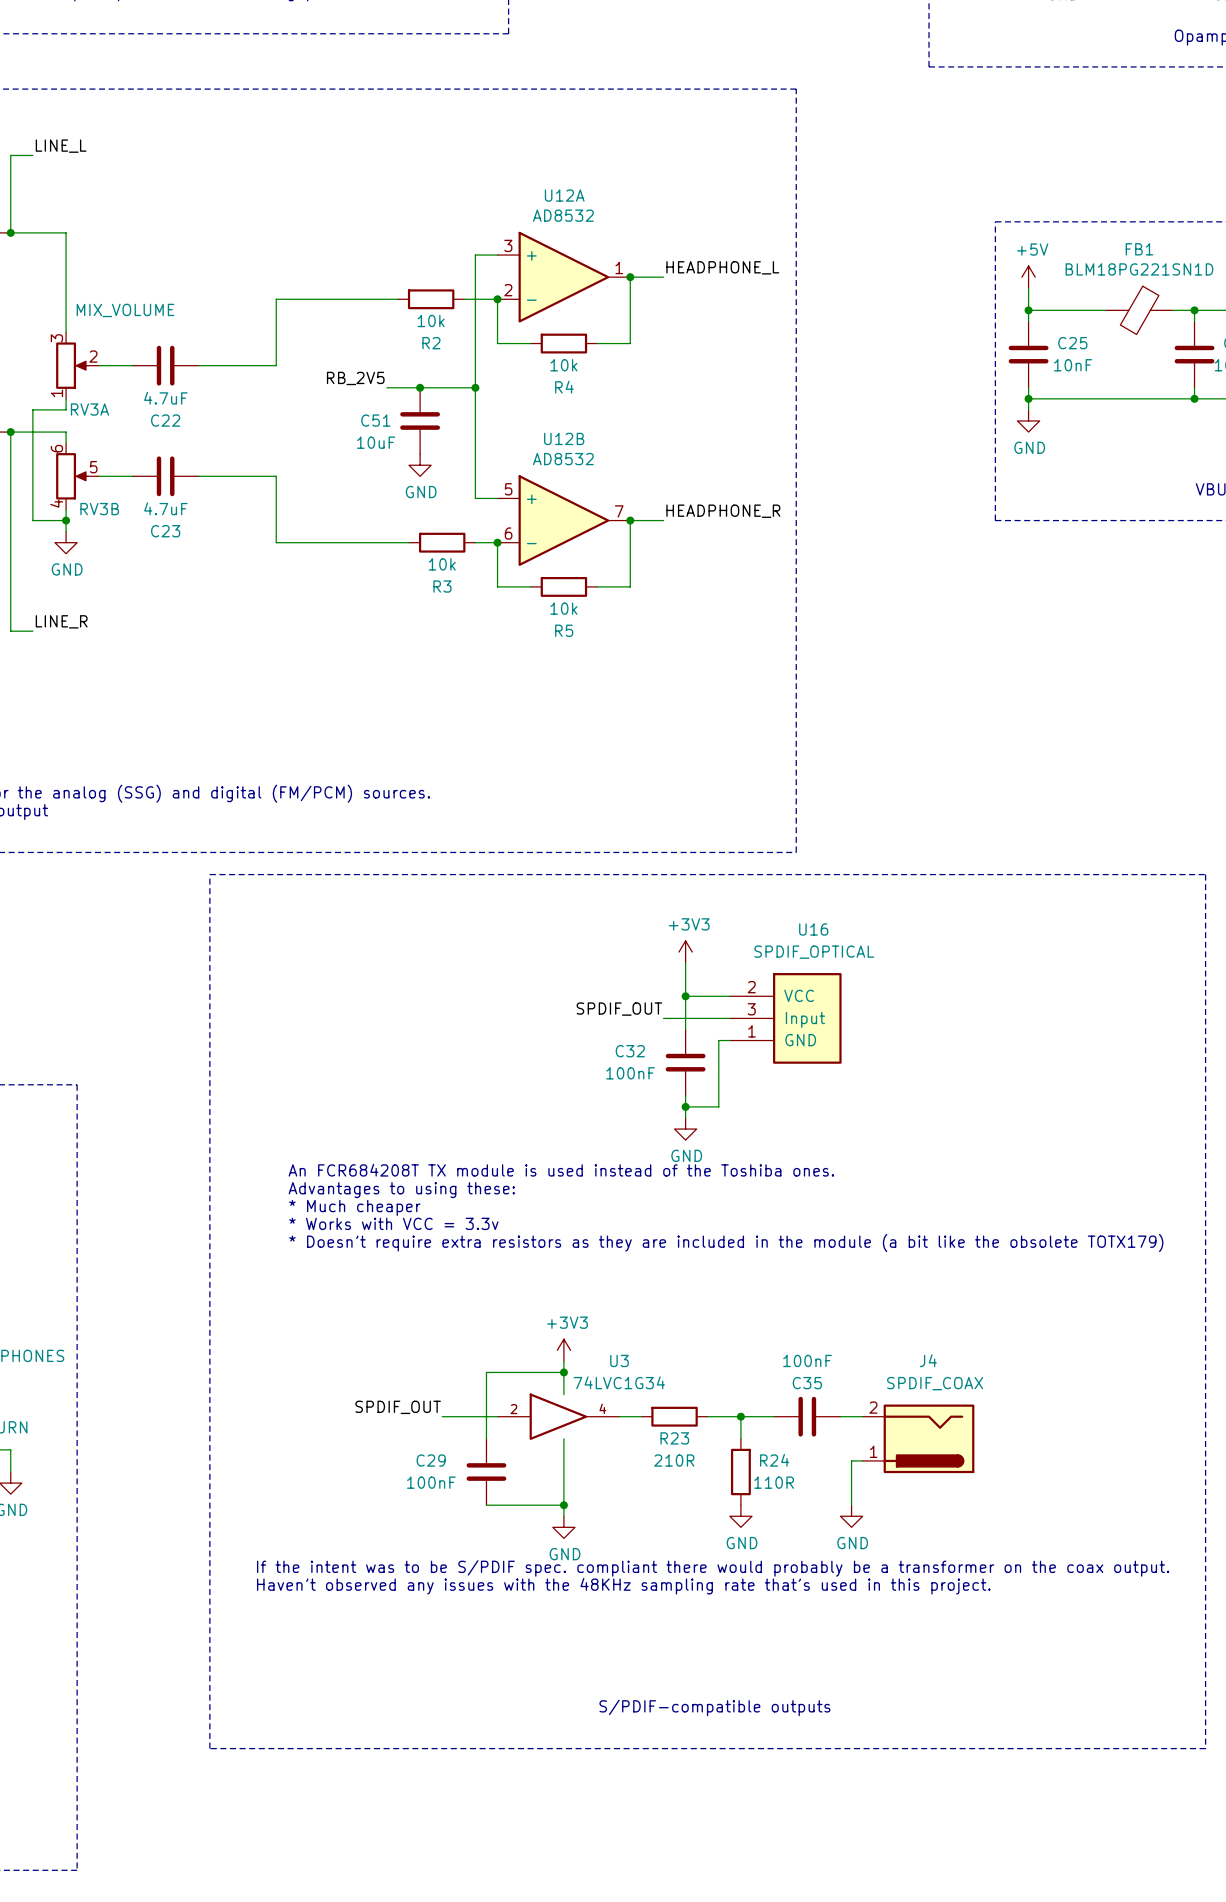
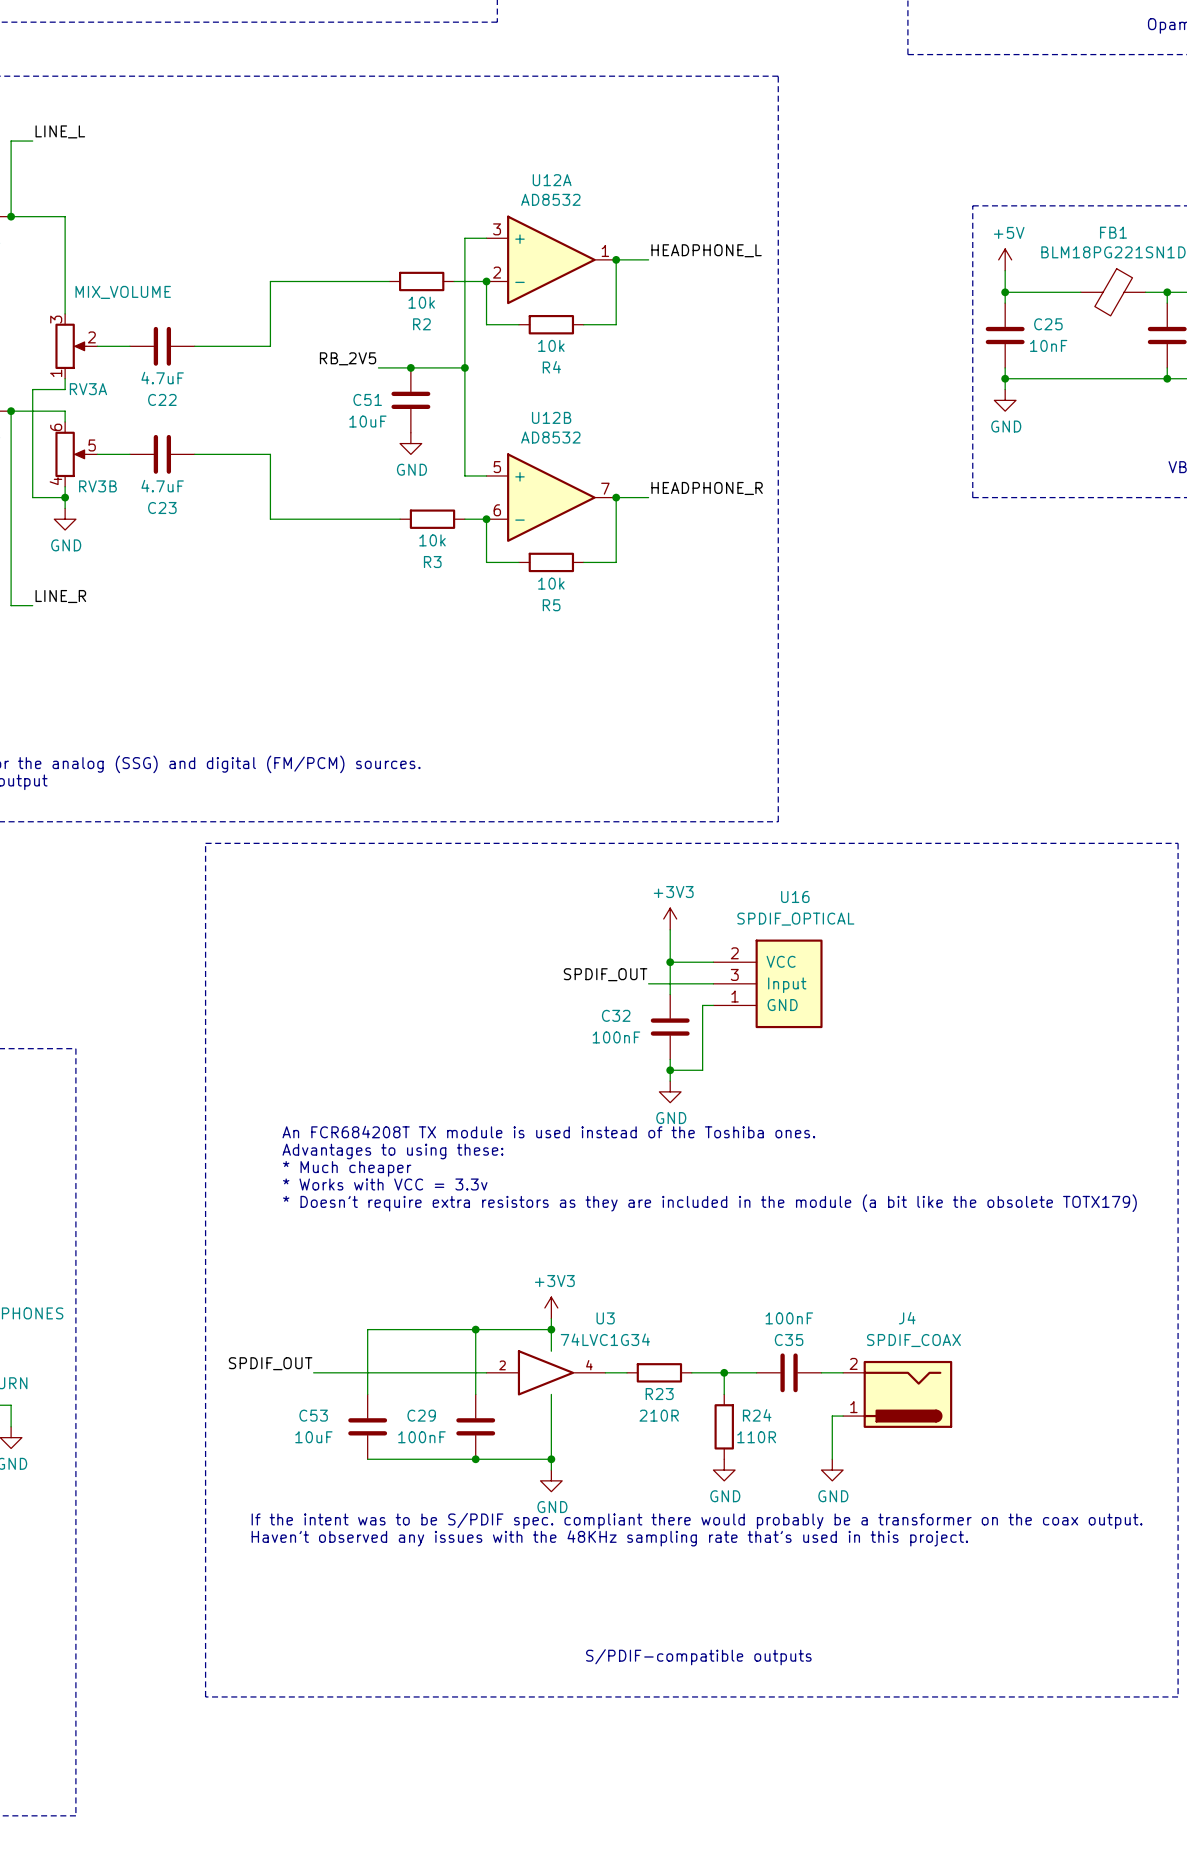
wire: none -> (475, 1329) (367, 1329) (367, 1394)
junction: none -> (475, 1329)
label position: SPDIF_OUT (398, 1407) -> SPDIF_OUT (270, 1363)
wire: none -> (313, 1372) (432, 1372)
C53: none -> 10uF (367, 1426)
wire: none -> (367, 1459) (475, 1459)
junction: none -> (475, 1459)

